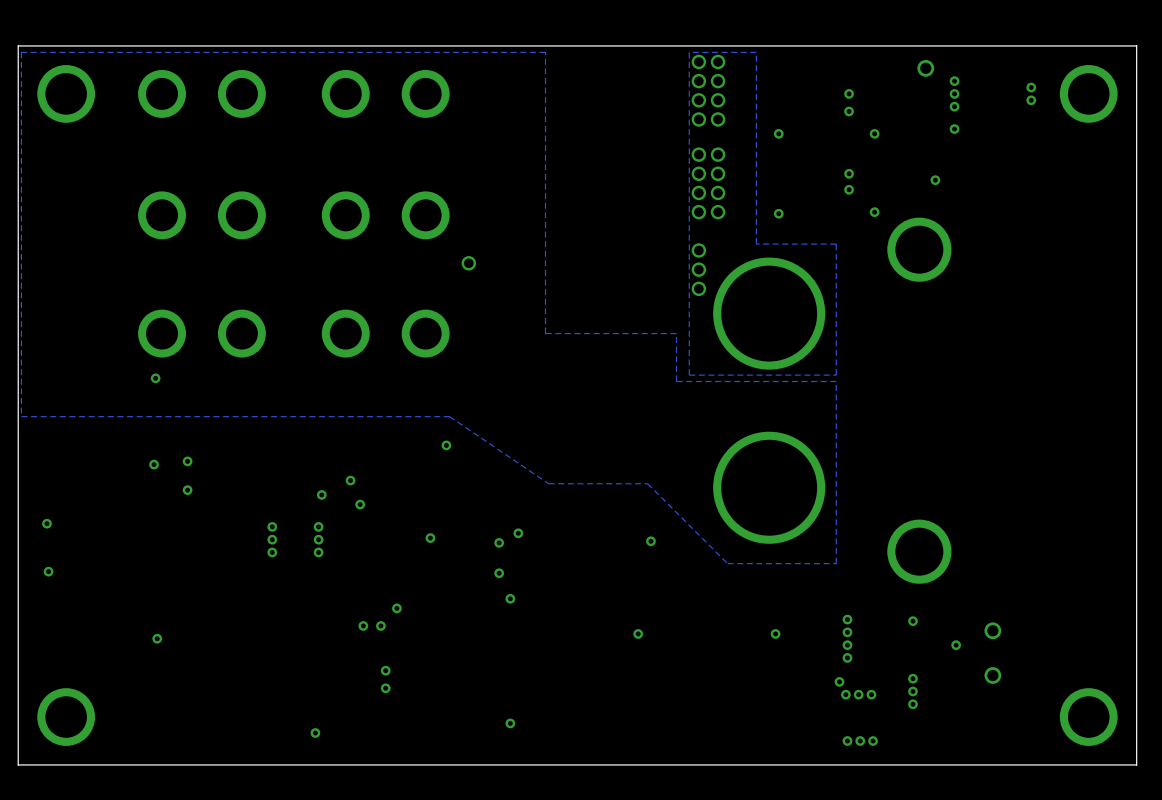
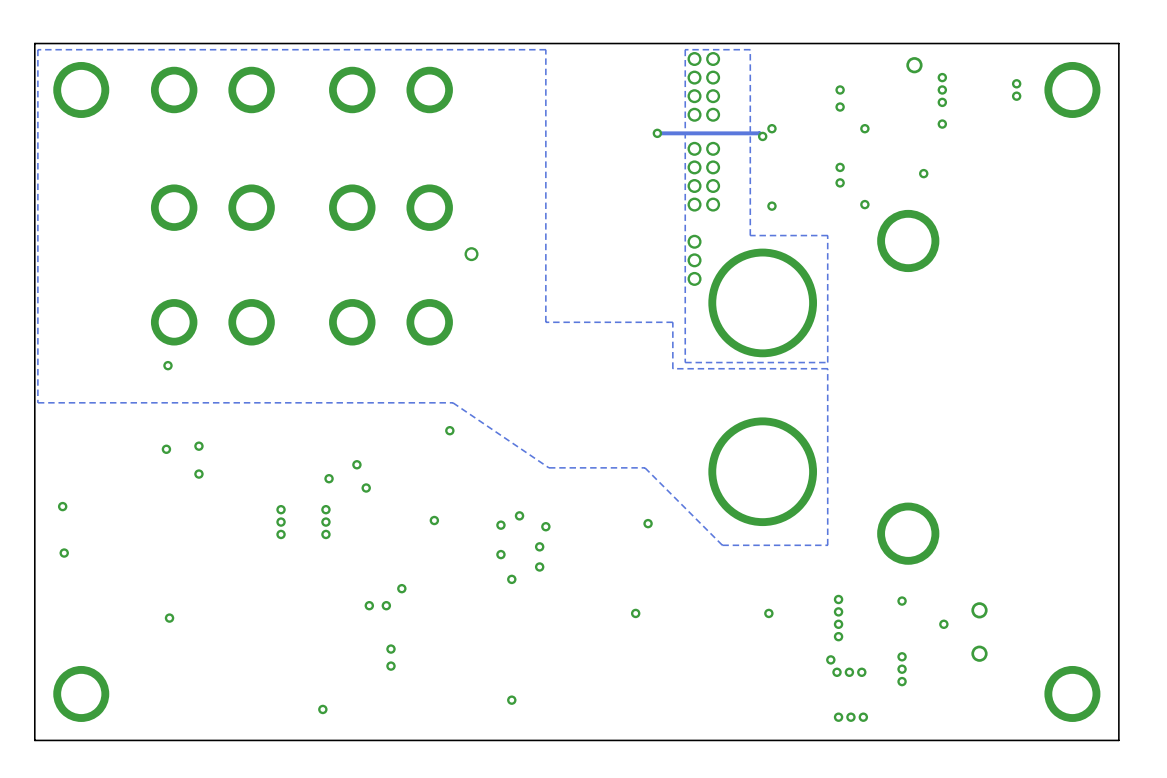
track: none -> (657, 133) (759, 133) (762, 136)
via: none -> (657, 133)
via: none -> (762, 136)
via: none -> (545, 526)
via: none -> (539, 546)
via: none -> (539, 566)

